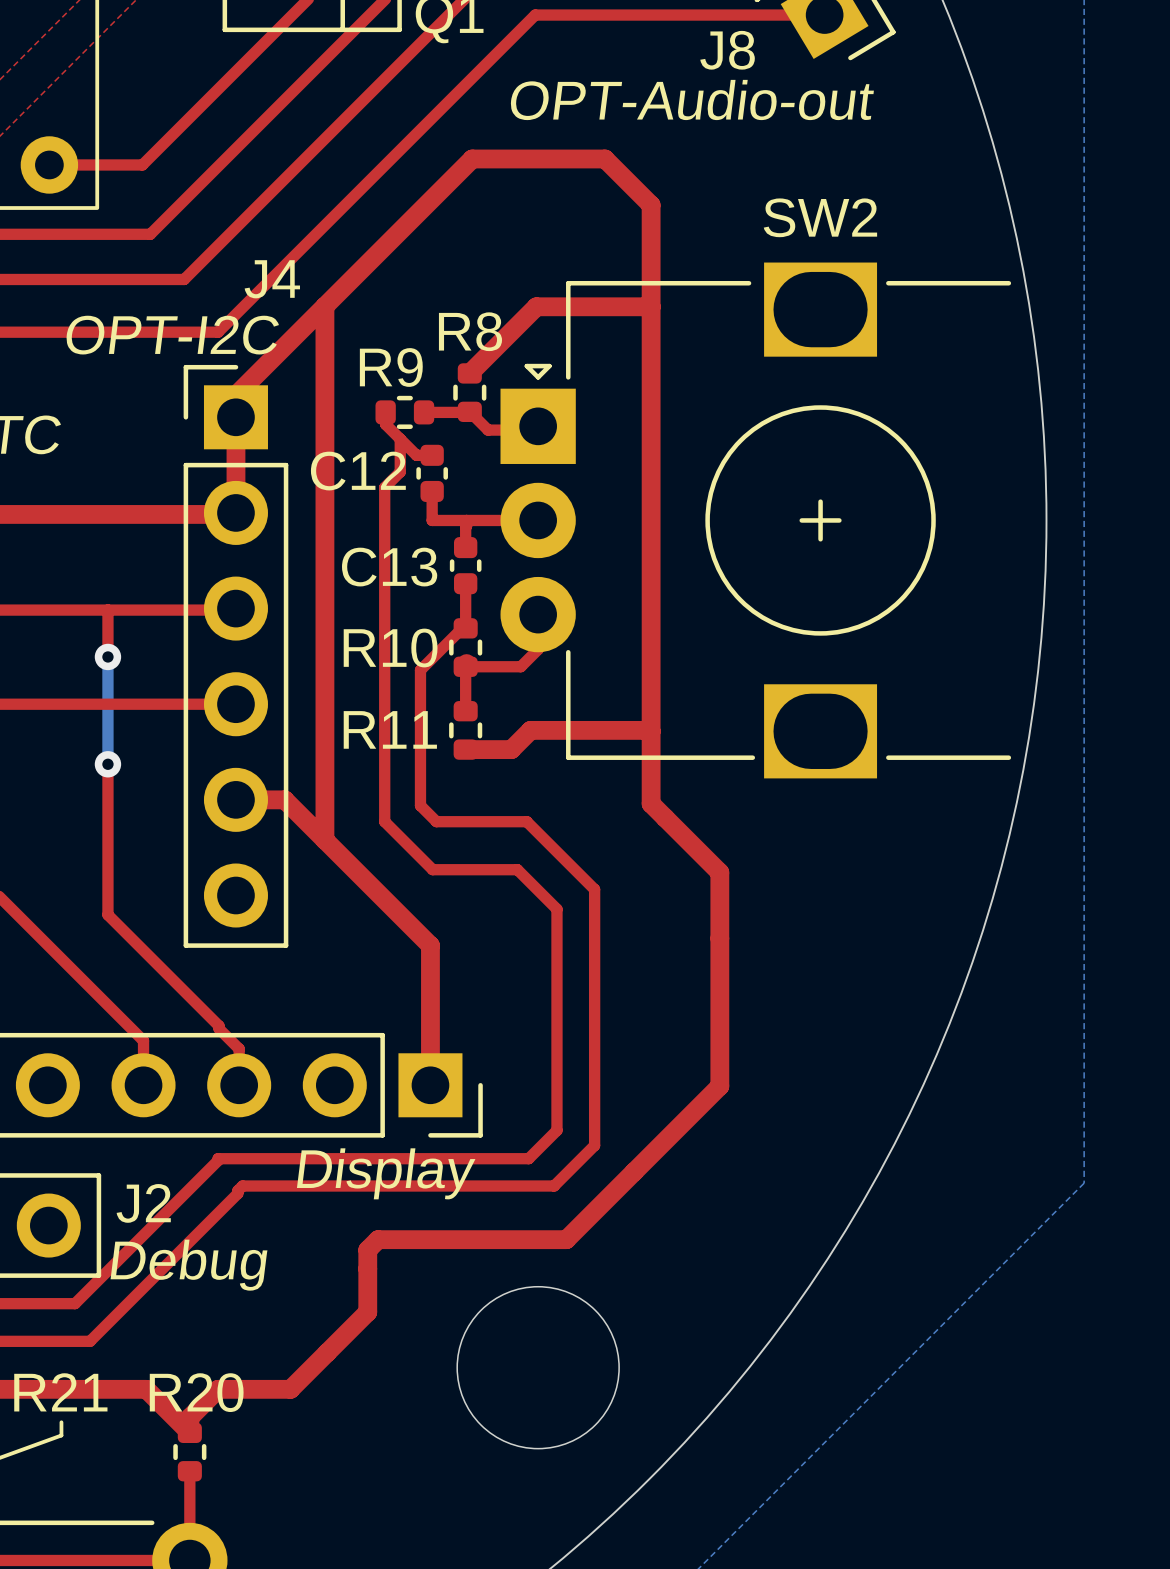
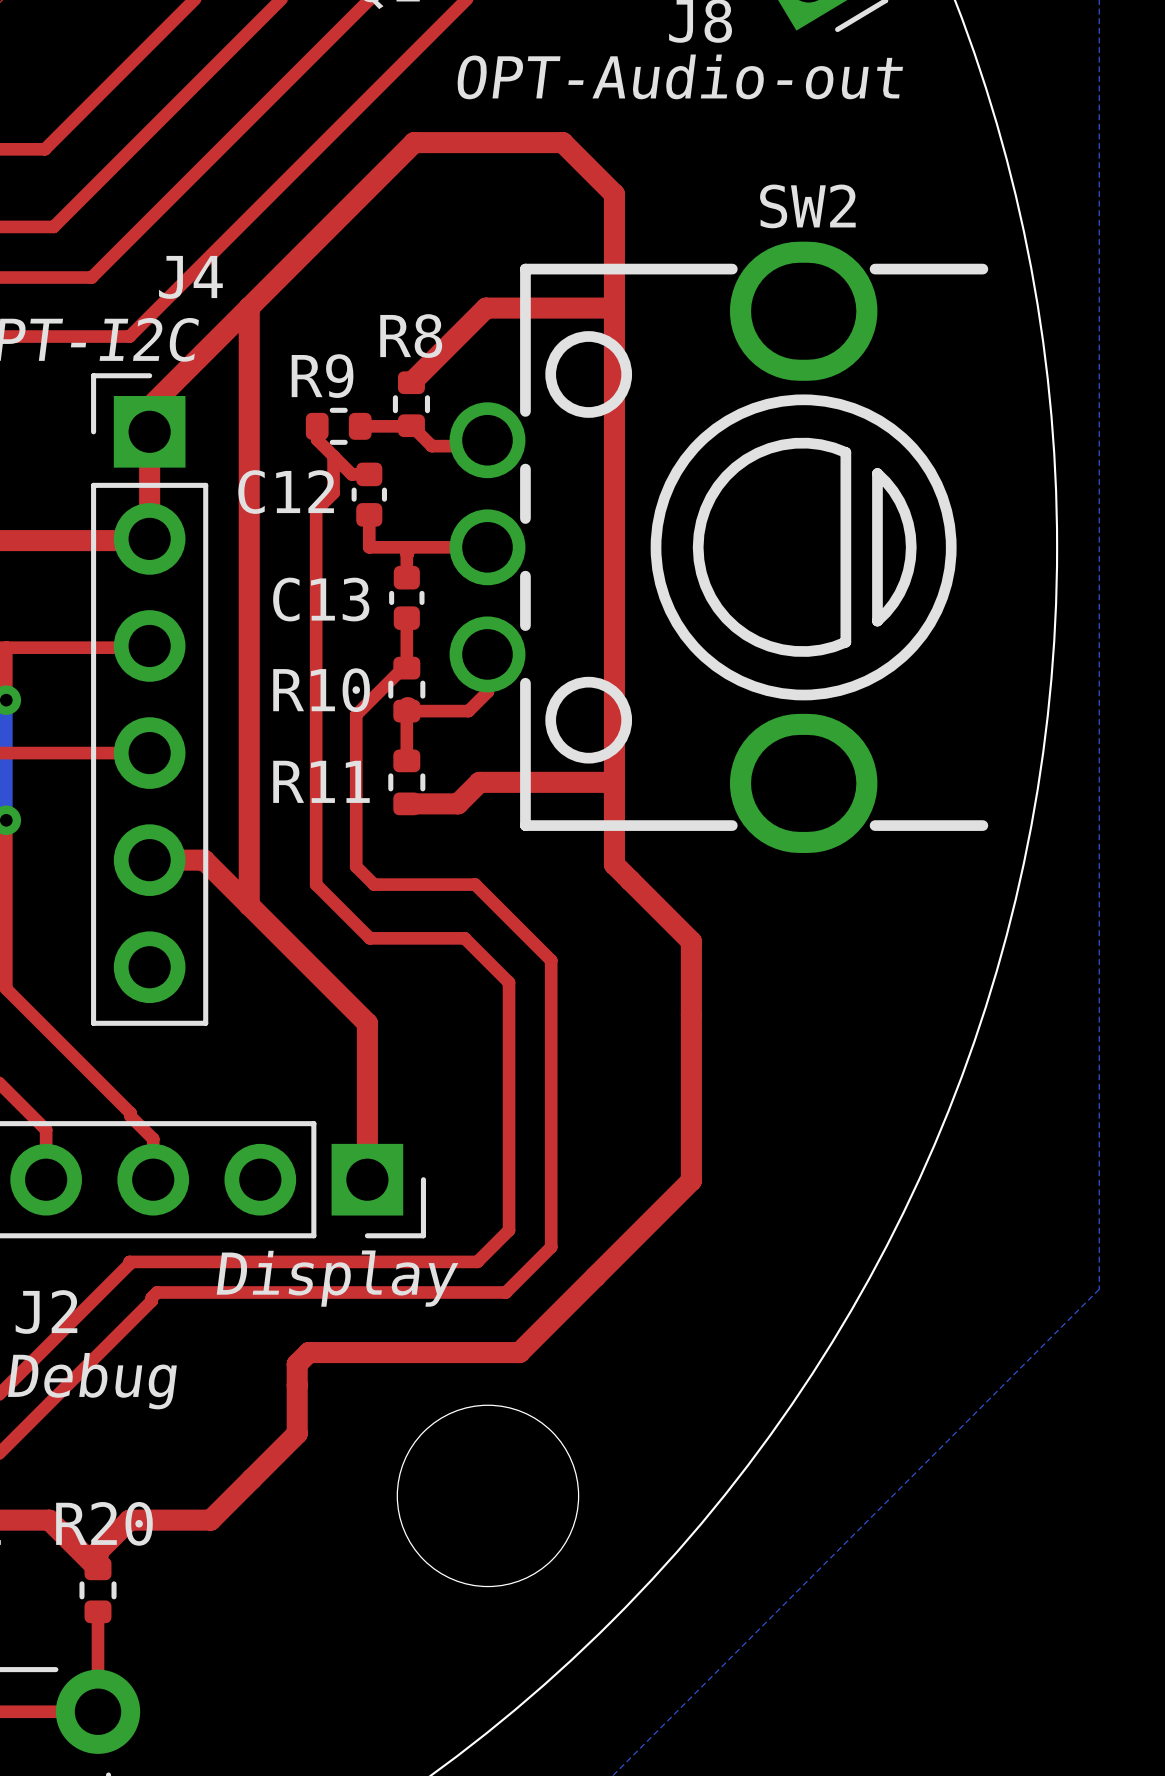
SW2 footprint: [500, 262, 1012, 779] -> [449, 241, 989, 853]

